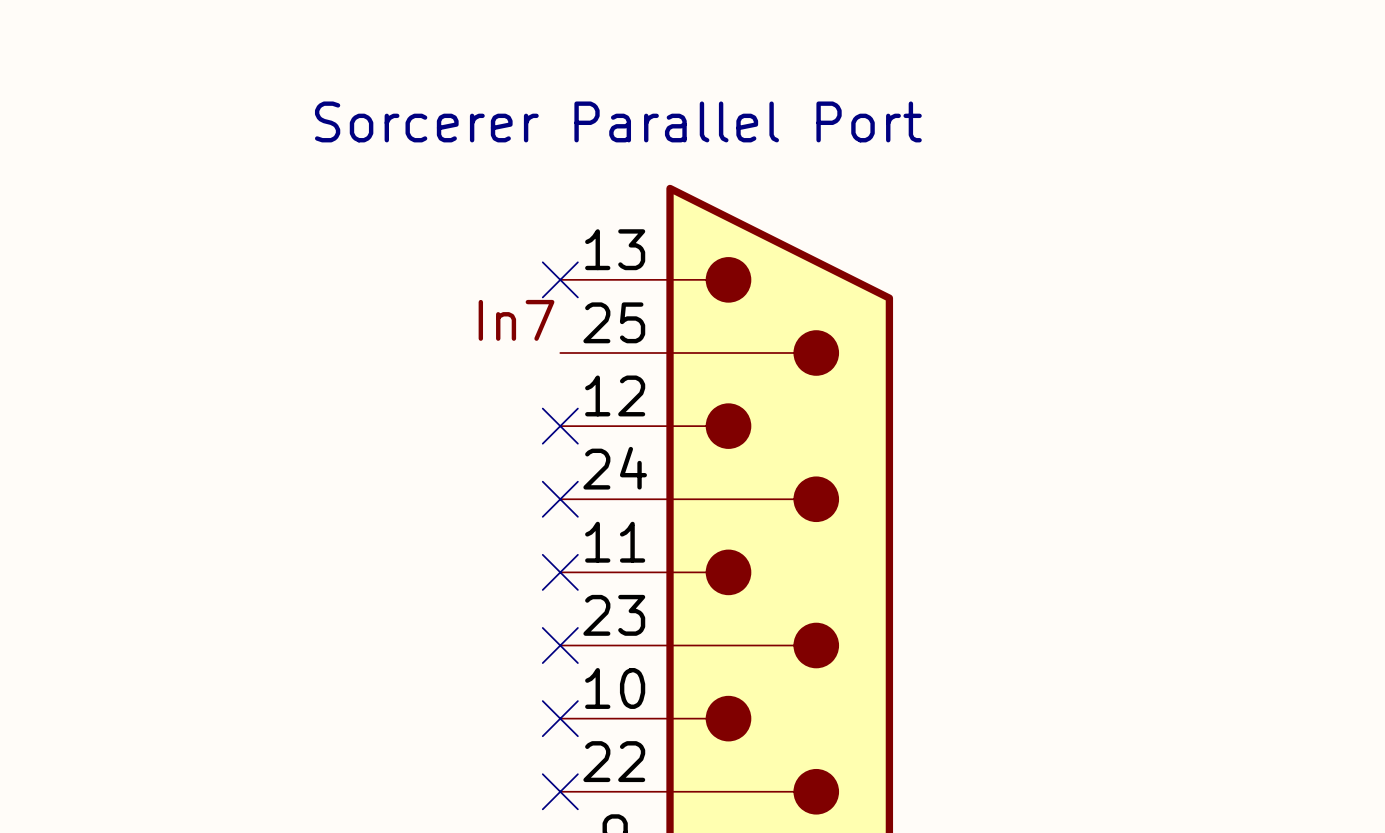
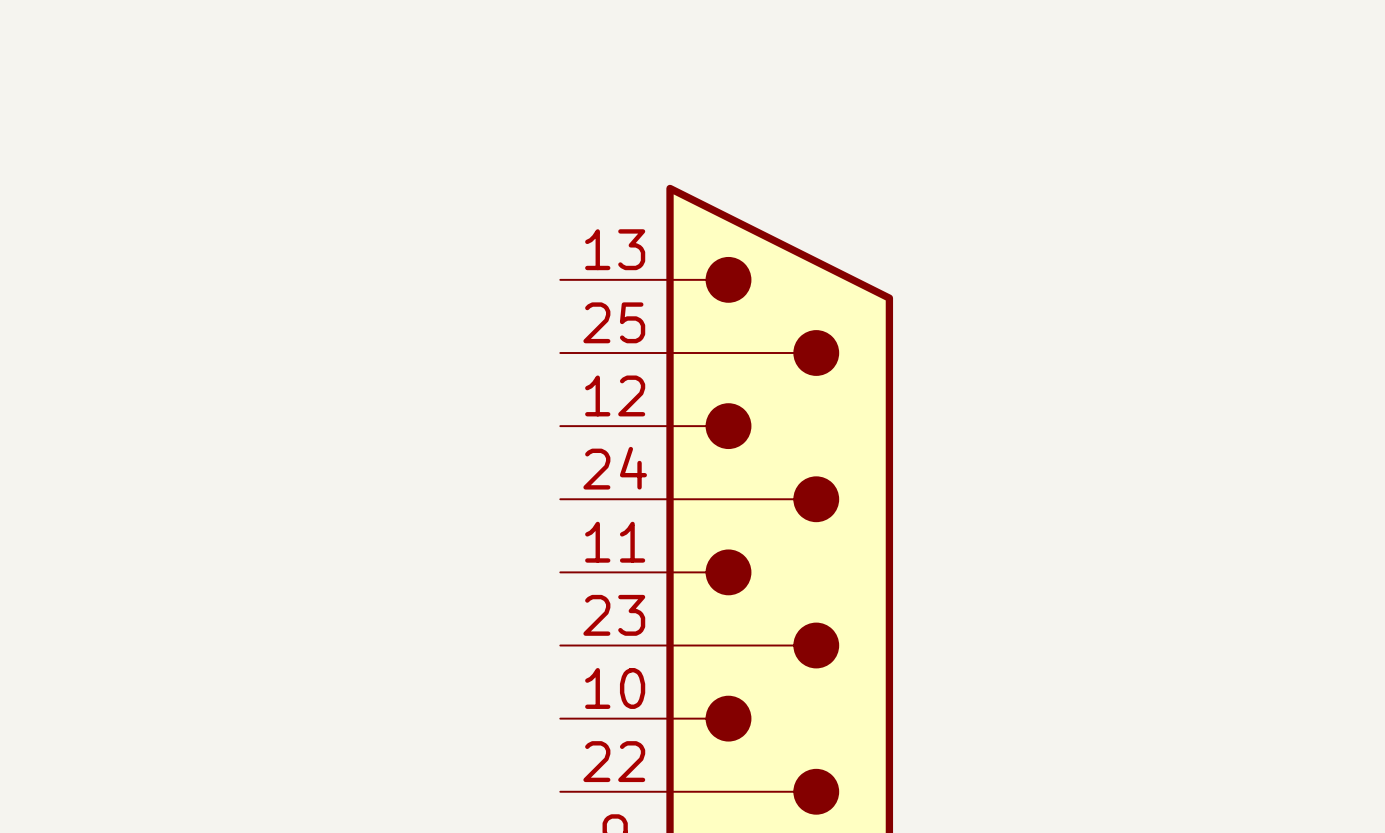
text: Sorcerer Parallel Port (618, 121) -> none
no-connect mark: (560, 279) -> none
label: In7 (516, 320) -> none
no-connect mark: (560, 426) -> none
no-connect mark: (560, 499) -> none
no-connect mark: (560, 572) -> none
no-connect mark: (560, 645) -> none
no-connect mark: (560, 718) -> none
no-connect mark: (560, 791) -> none

